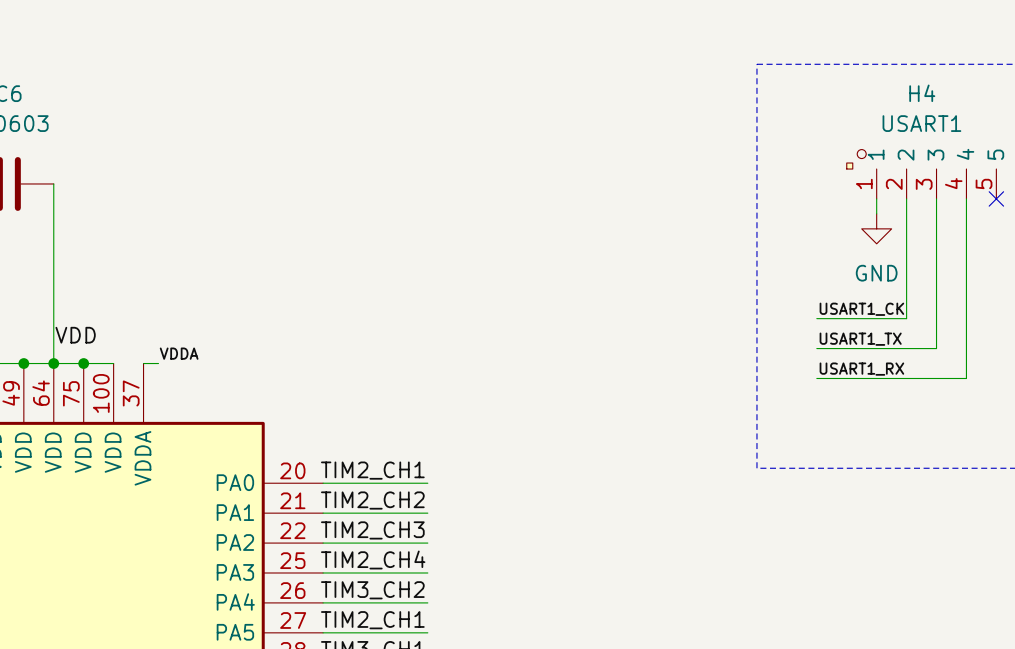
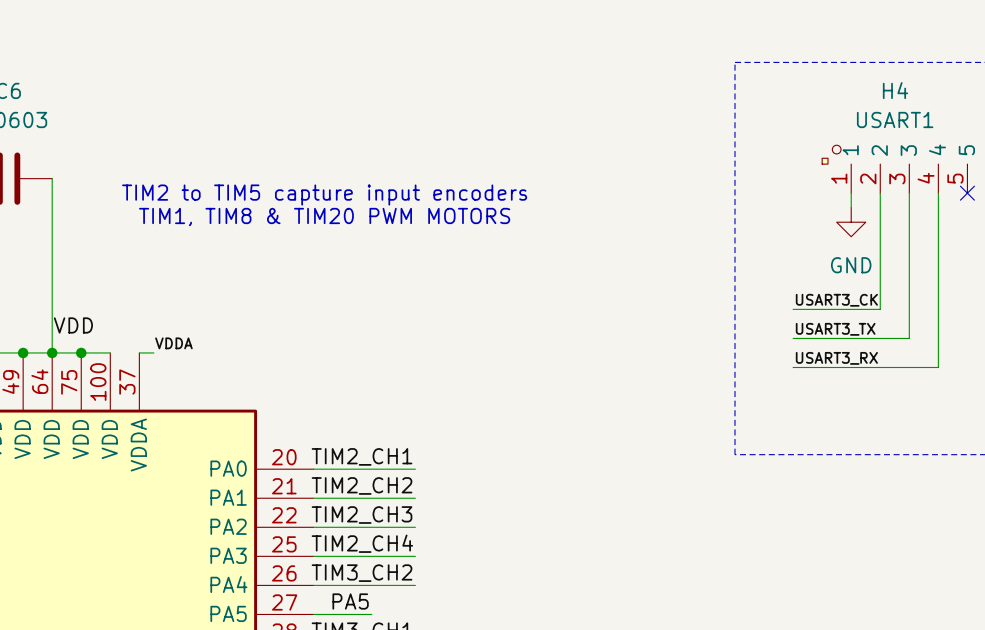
text: none -> TIM2 to TIM5 capture input encoders (324, 195)
text: none -> TIM1, TIM8 & TIM20 PWM MOTORS (324, 217)
label: USART1_CK (861, 309) -> USART3_CK (836, 300)
label: USART1_TX (860, 339) -> USART3_TX (835, 329)
label: USART1_RX (861, 369) -> USART3_RX (836, 358)
label: none -> PA5 (350, 601)
label: TIM2_CH1 (372, 620) -> none
wire: (382, 632) (427, 632) -> none

